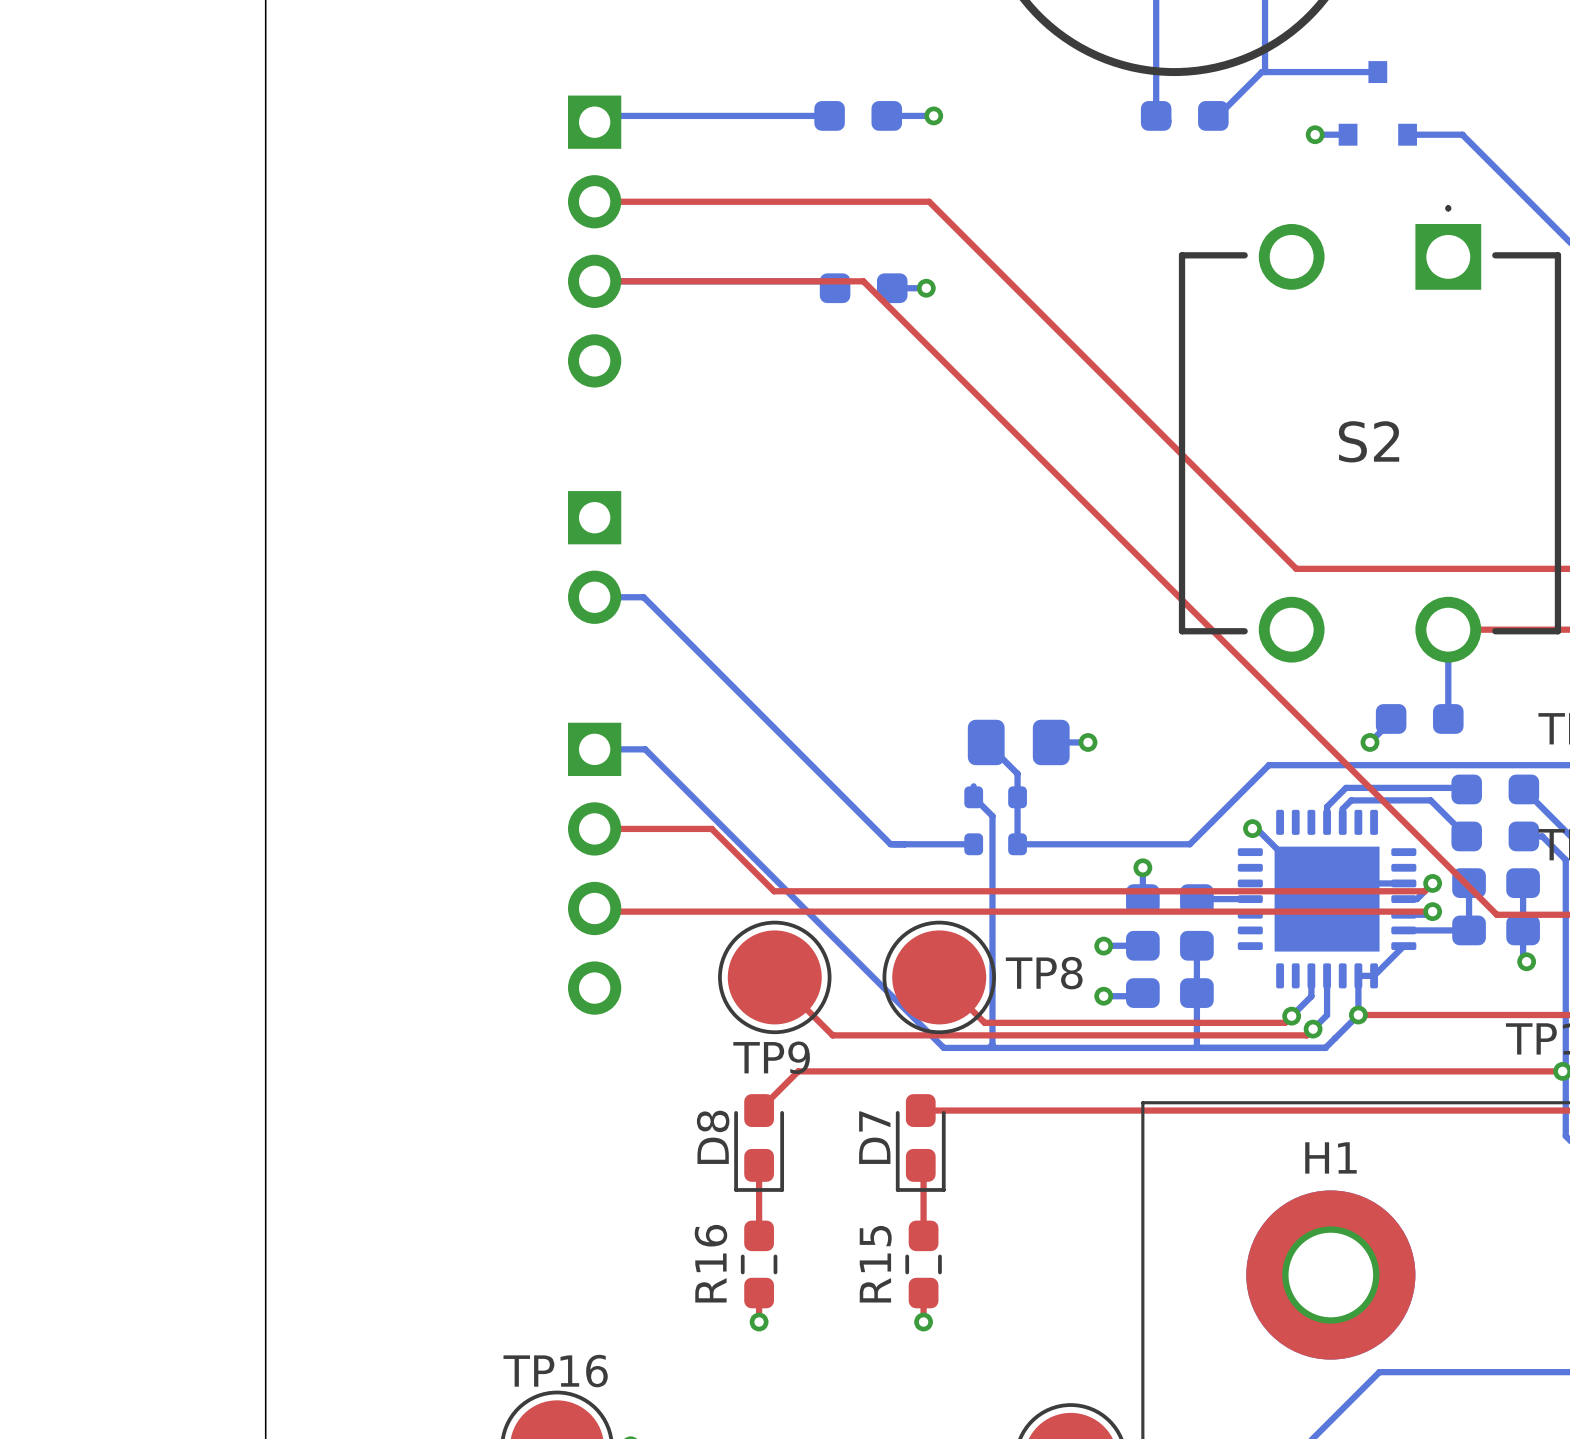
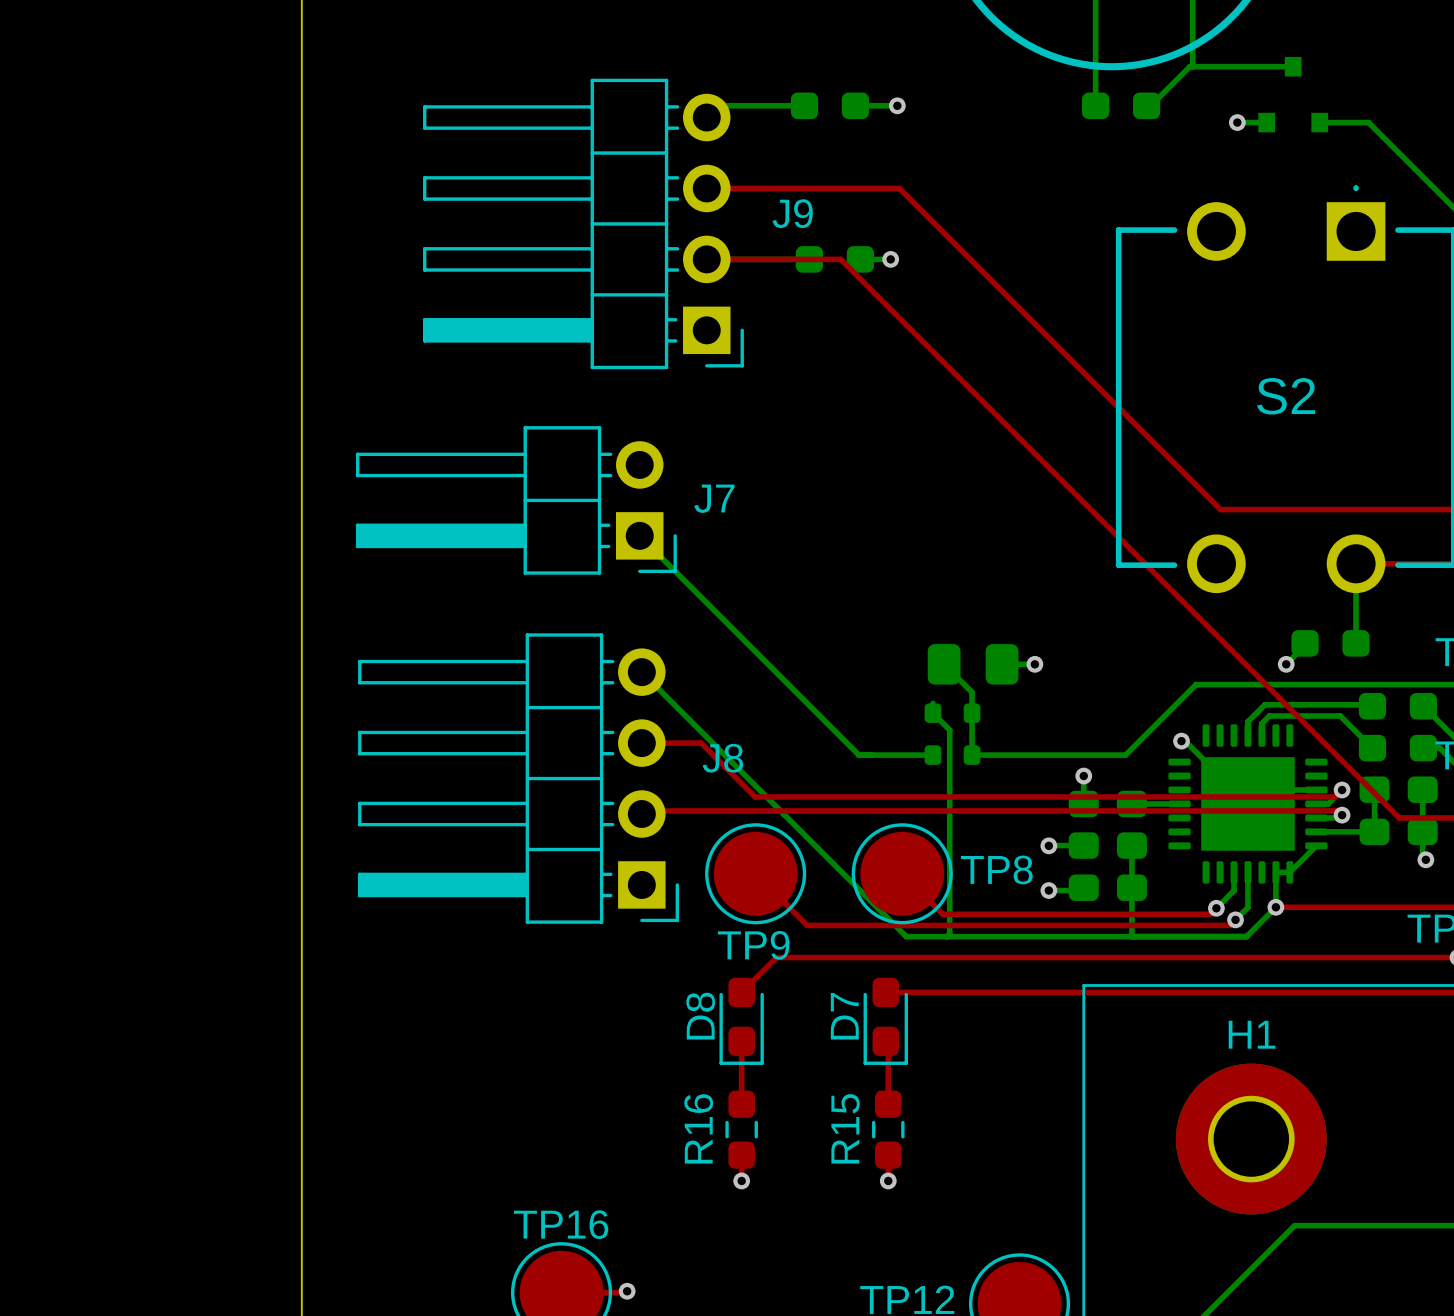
bottom track: (727, 115) (600, 115) (594, 122) -> none
top track: (594, 201) (929, 201) (936, 208) -> (706, 188) (899, 188)
J9 side: bottom (594, 241) -> top (583, 223)
top track: (594, 281) (863, 281) (870, 288) -> (706, 259) (840, 259)
J7 side: bottom (594, 557) -> top (516, 500)
bottom track: (594, 597) (644, 598) -> none
bottom track: (594, 749) (645, 749) (647, 751) -> none
top track: (594, 828) (711, 828) (713, 830) -> (641, 743) (701, 743)
J8 side: bottom (594, 868) -> top (518, 778)
top track: (594, 908) (597, 911) (1432, 911) -> (641, 814) (644, 810) (1337, 810) (1342, 815)

